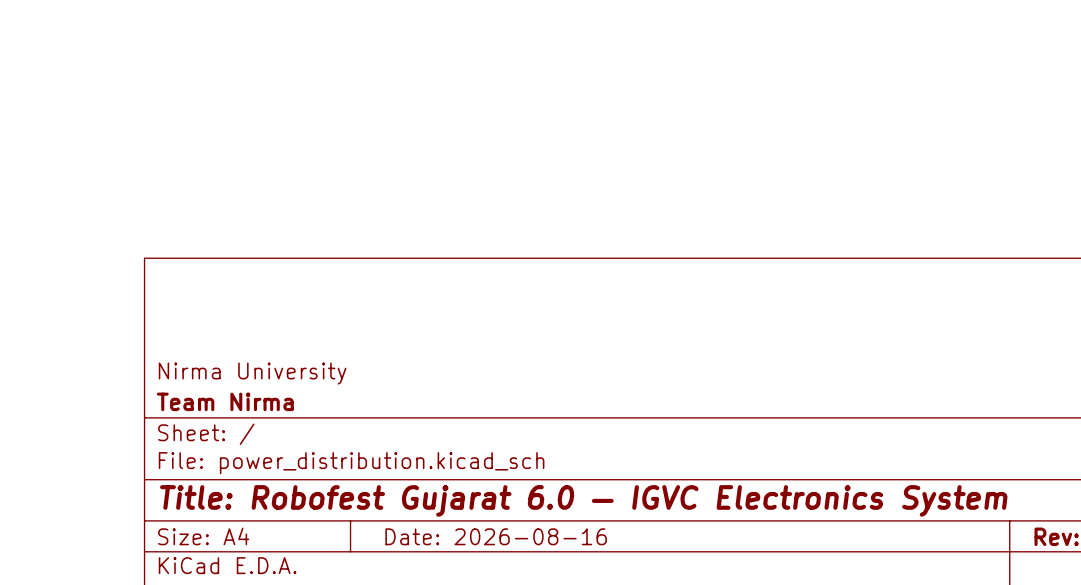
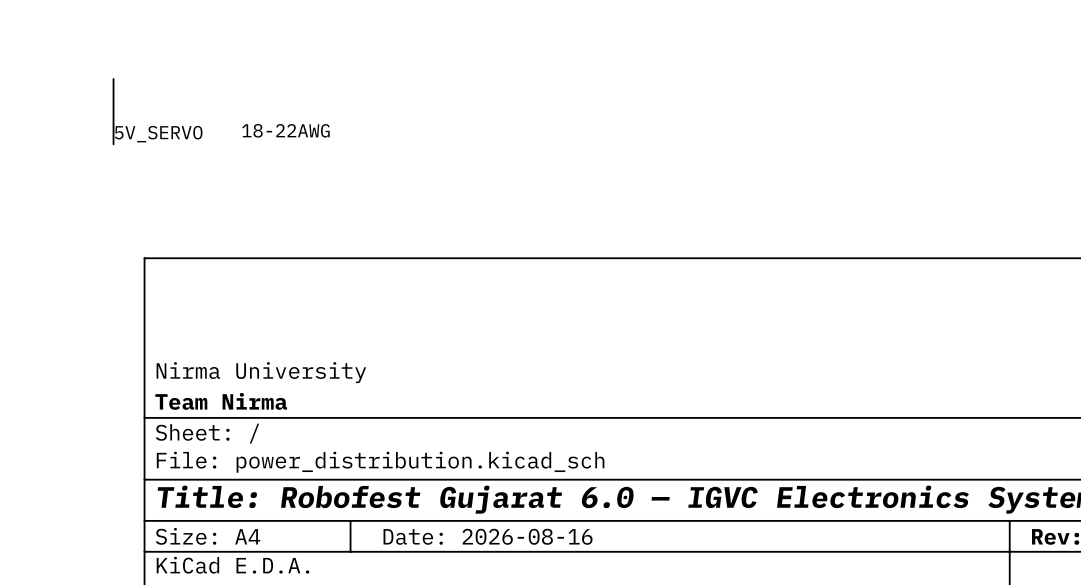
wire: none -> (113, 78) (113, 144)
text: none -> 18-22AWG (285, 130)
label: none -> 5V_SERVO (158, 134)

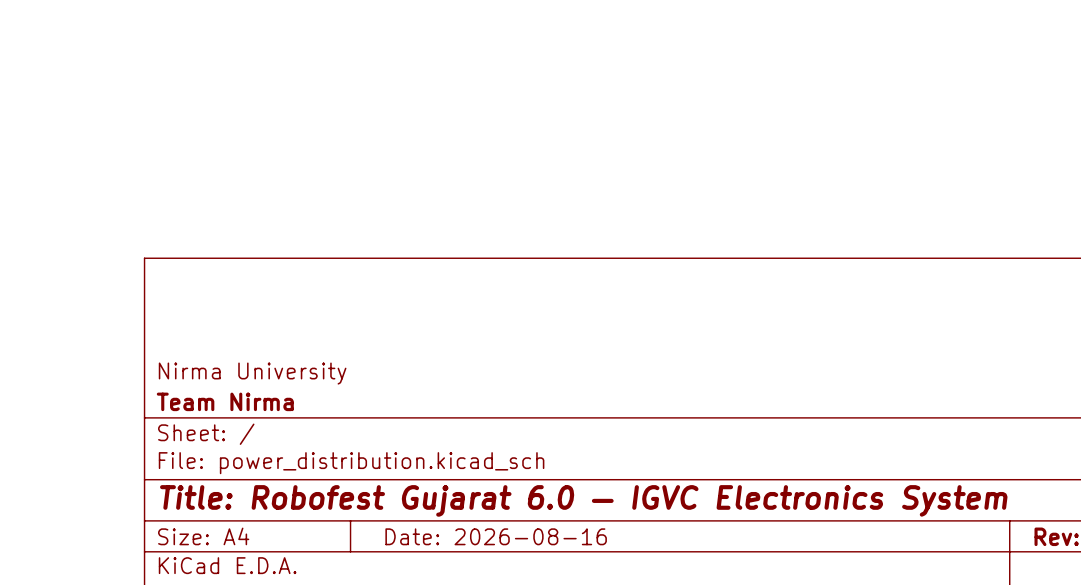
wire: (113, 78) (113, 144) -> none
text: 18-22AWG (285, 130) -> none
label: 5V_SERVO (158, 134) -> none

